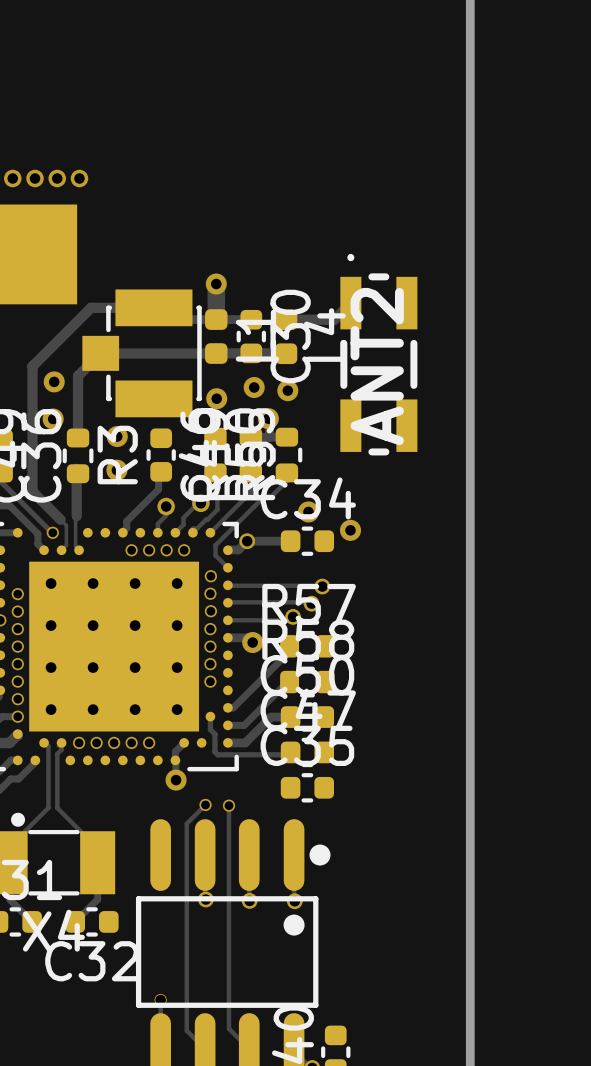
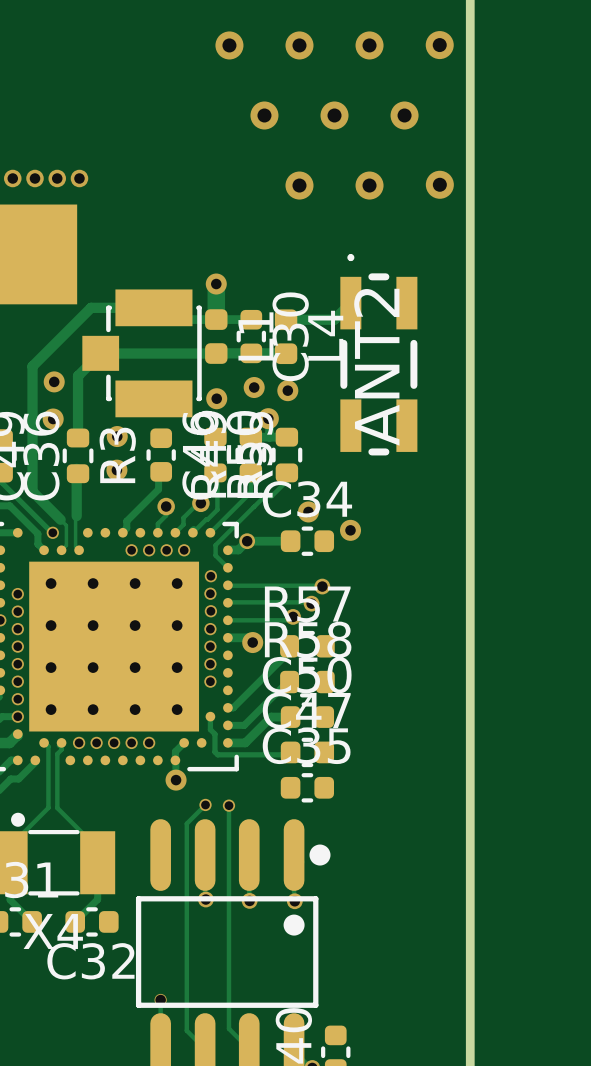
via: none -> (229, 45)
via: none -> (299, 45)
via: none -> (369, 45)
via: none -> (439, 45)
via: none -> (264, 115)
via: none -> (334, 115)
via: none -> (404, 115)
via: none -> (439, 184)
via: none -> (299, 185)
via: none -> (369, 185)

